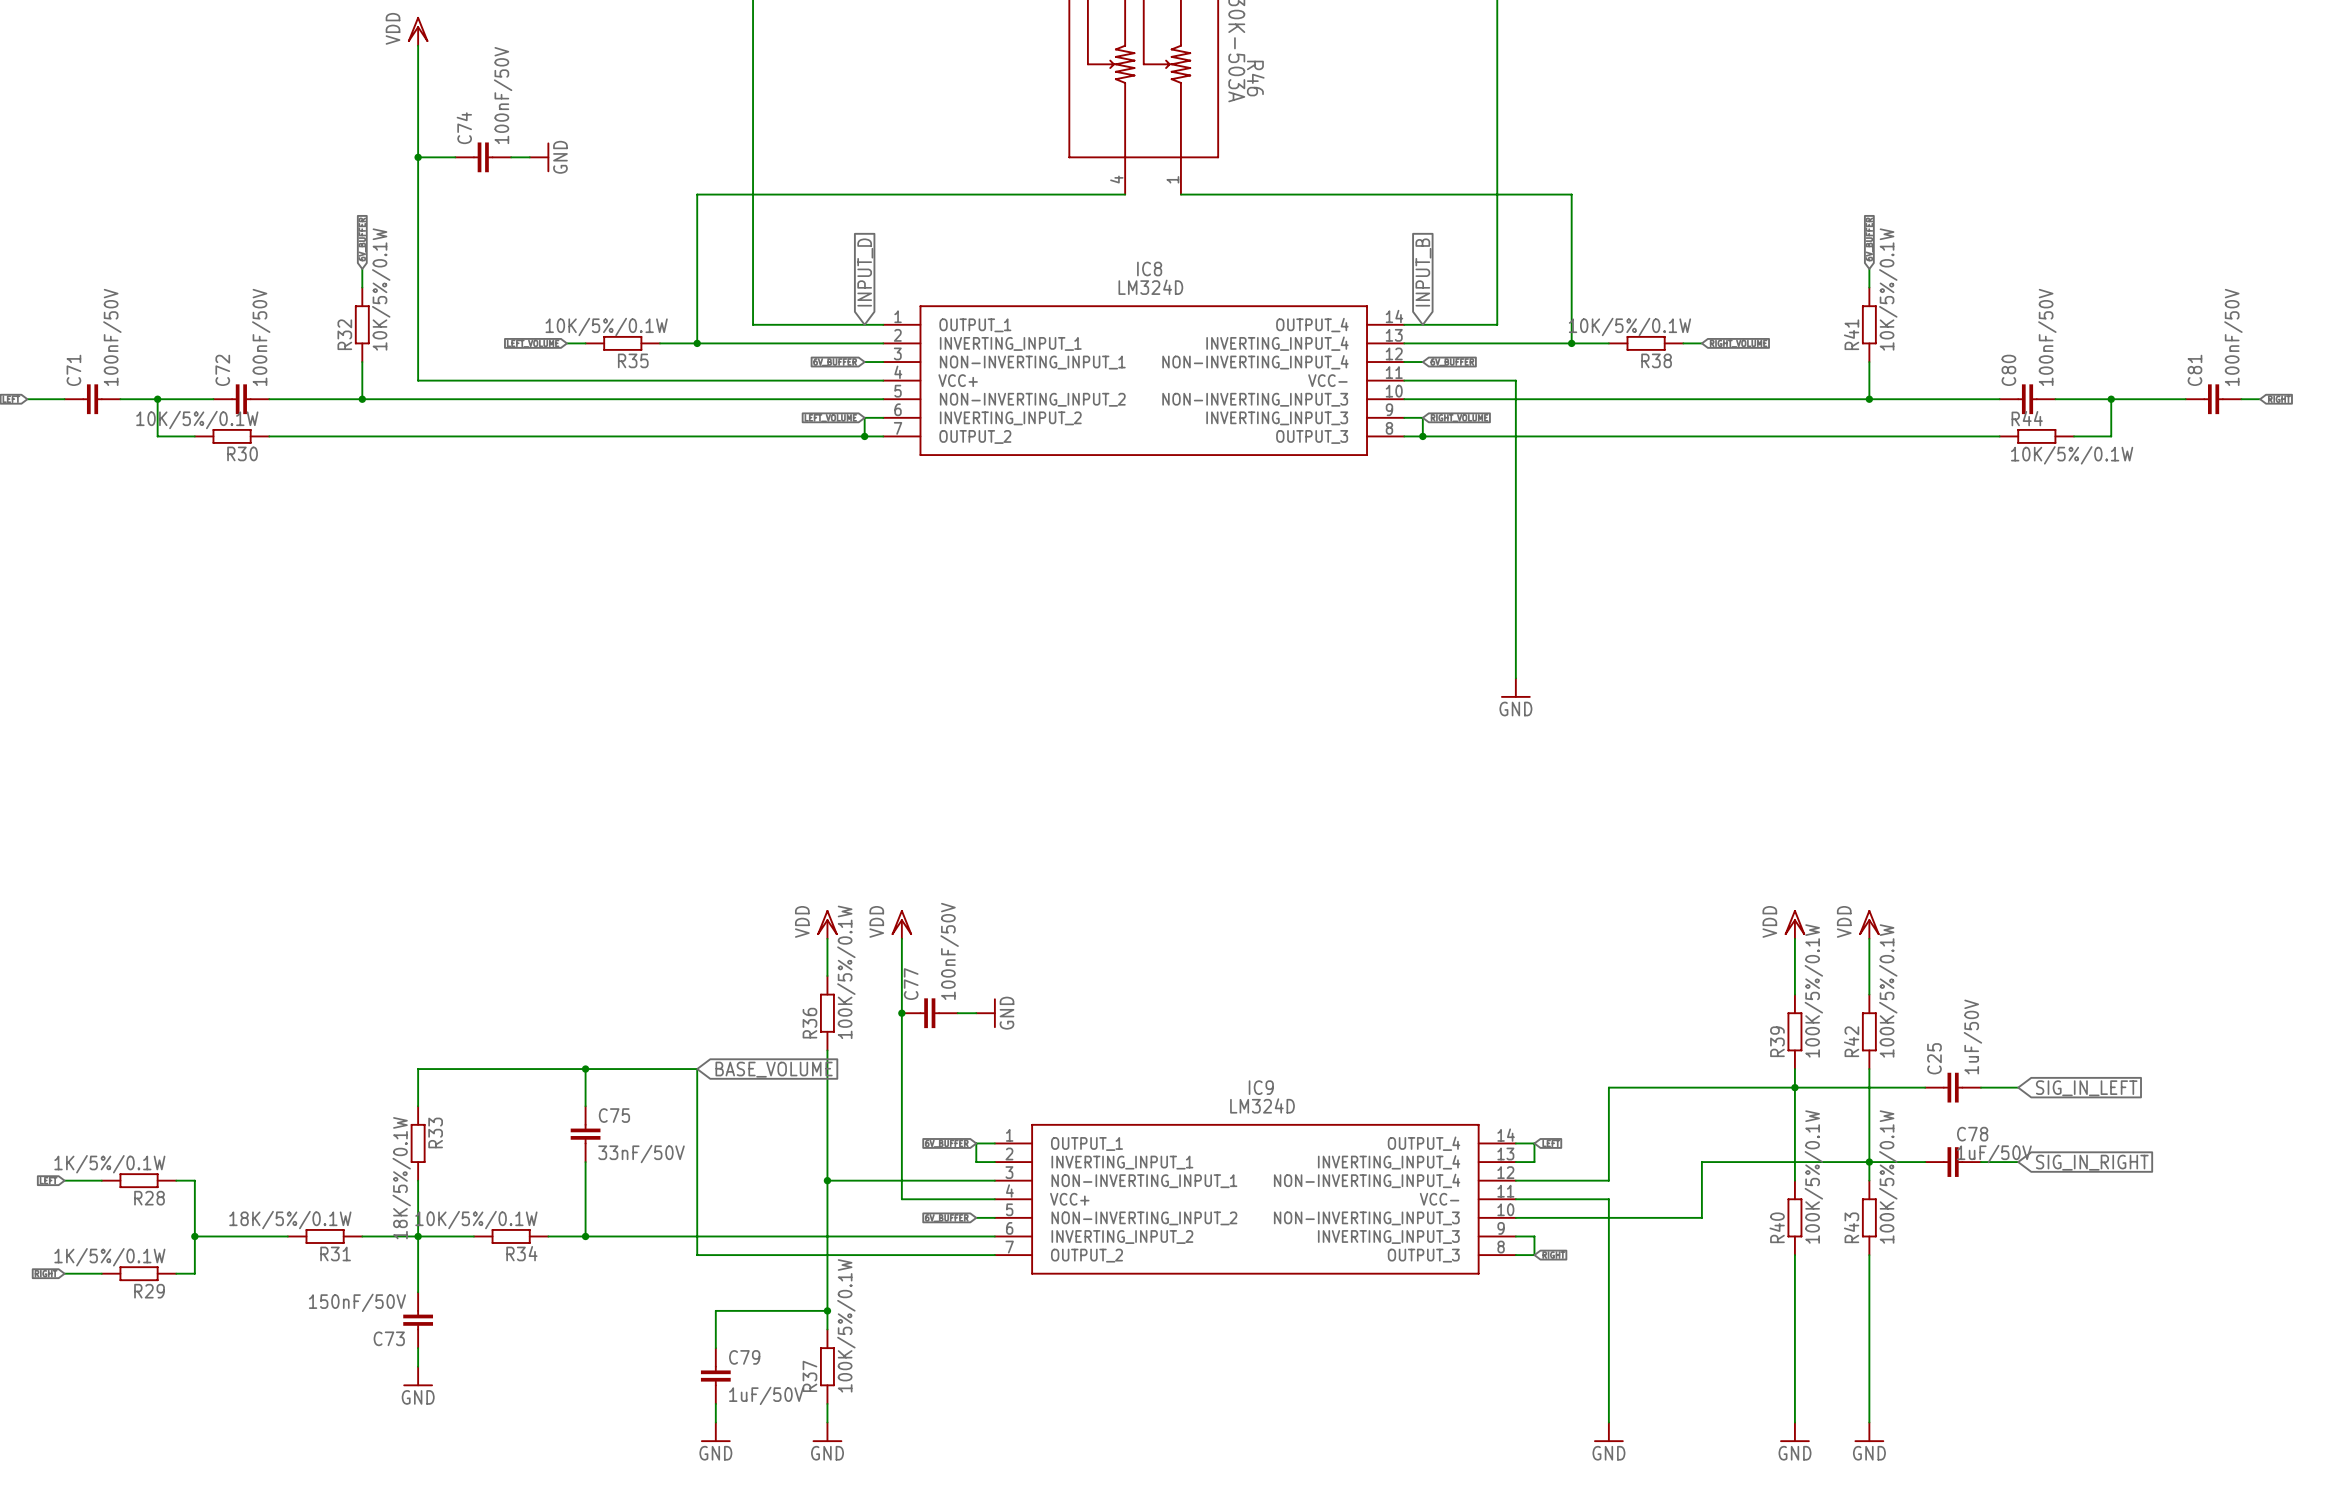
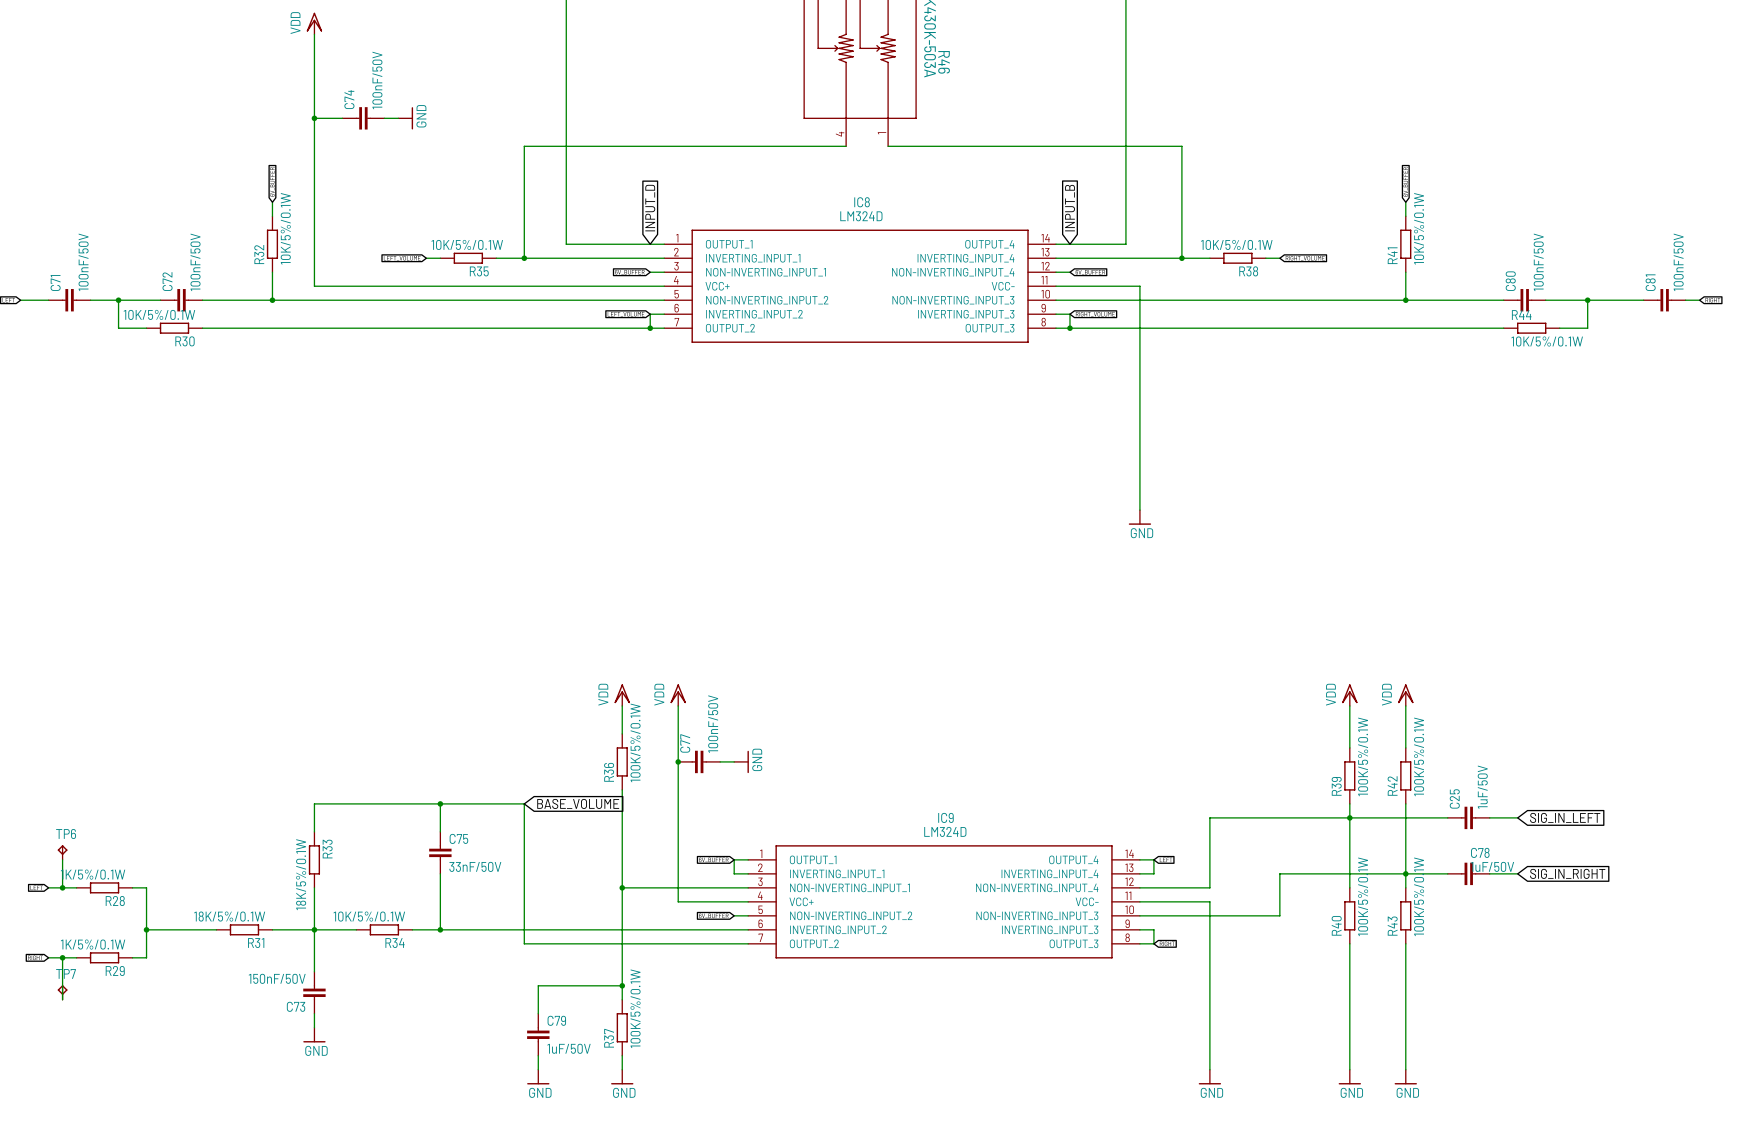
TP6: none -> (62, 852)
wire: none -> (62, 859) (62, 887)
junction: none -> (62, 887)
wire: none -> (62, 957) (62, 999)
junction: none -> (62, 957)
TP7: none -> (62, 992)

